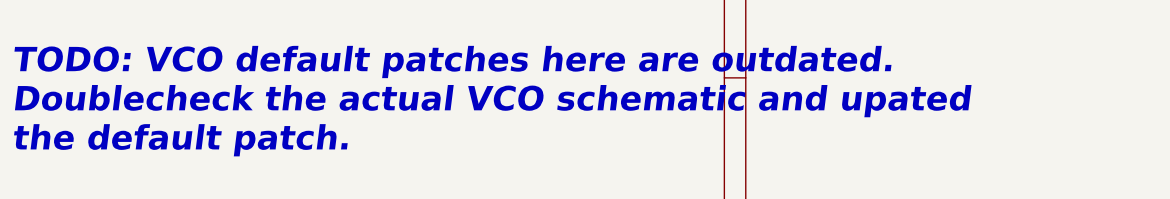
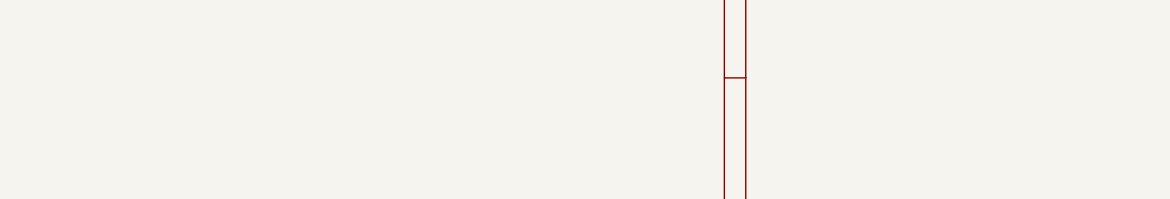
text: TODO: VCO default patches here are outdated. (452, 62) -> none
text: Doublecheck the actual VCO schematic and upated (493, 101) -> none
text: the default patch. (180, 140) -> none

